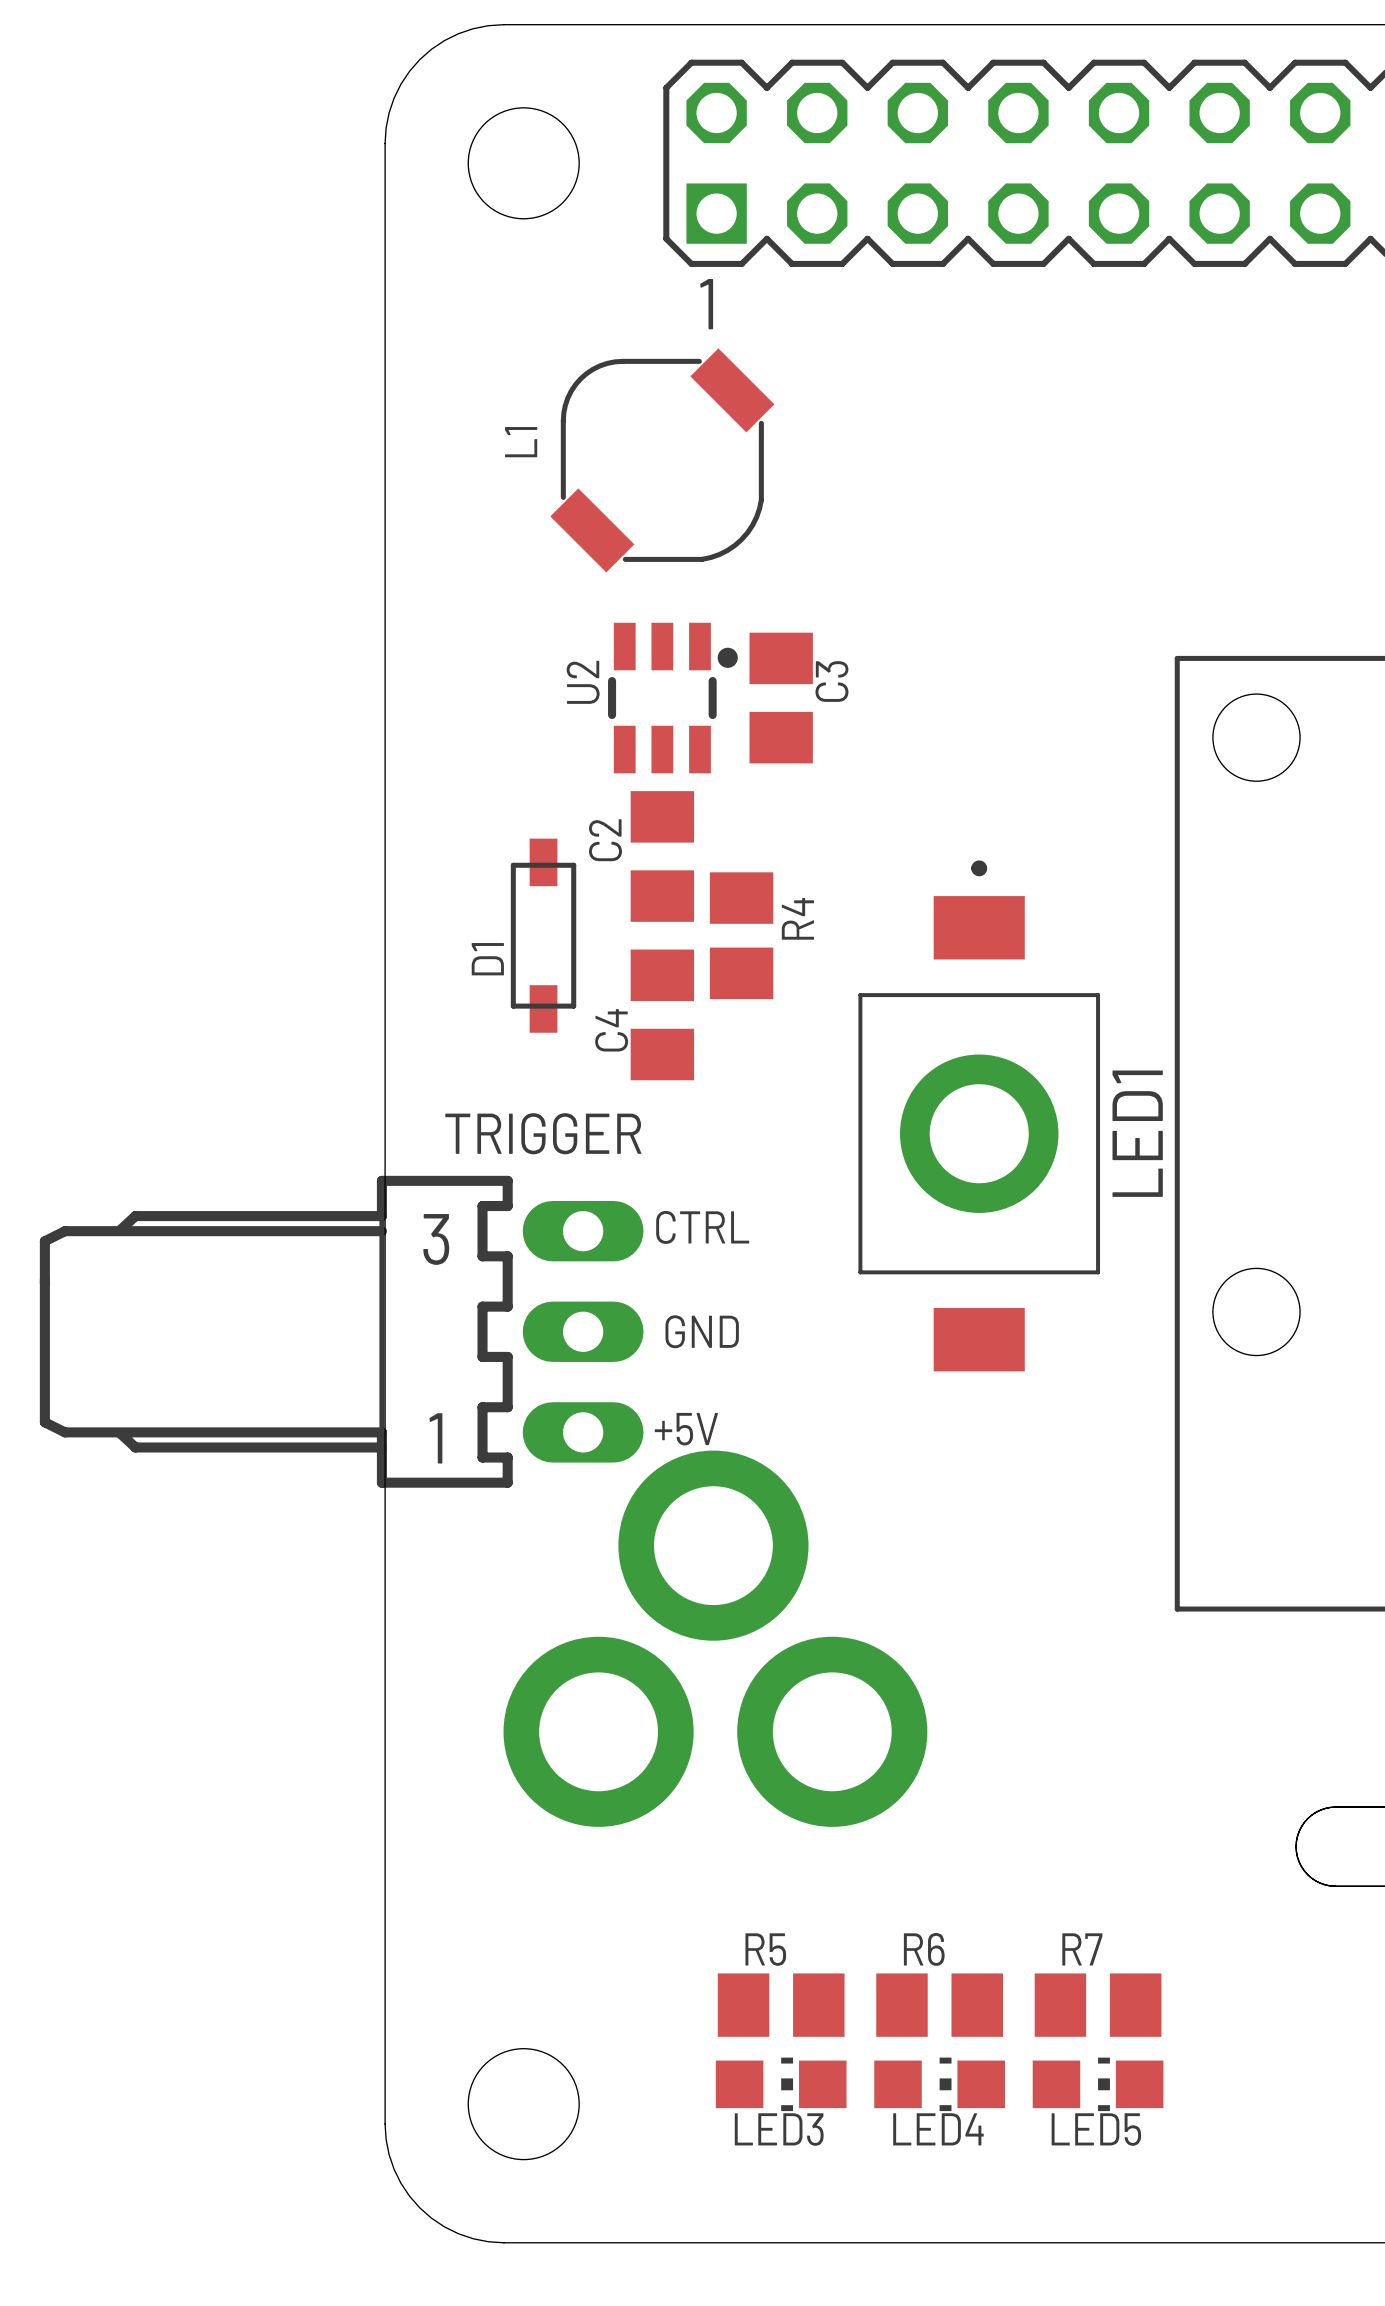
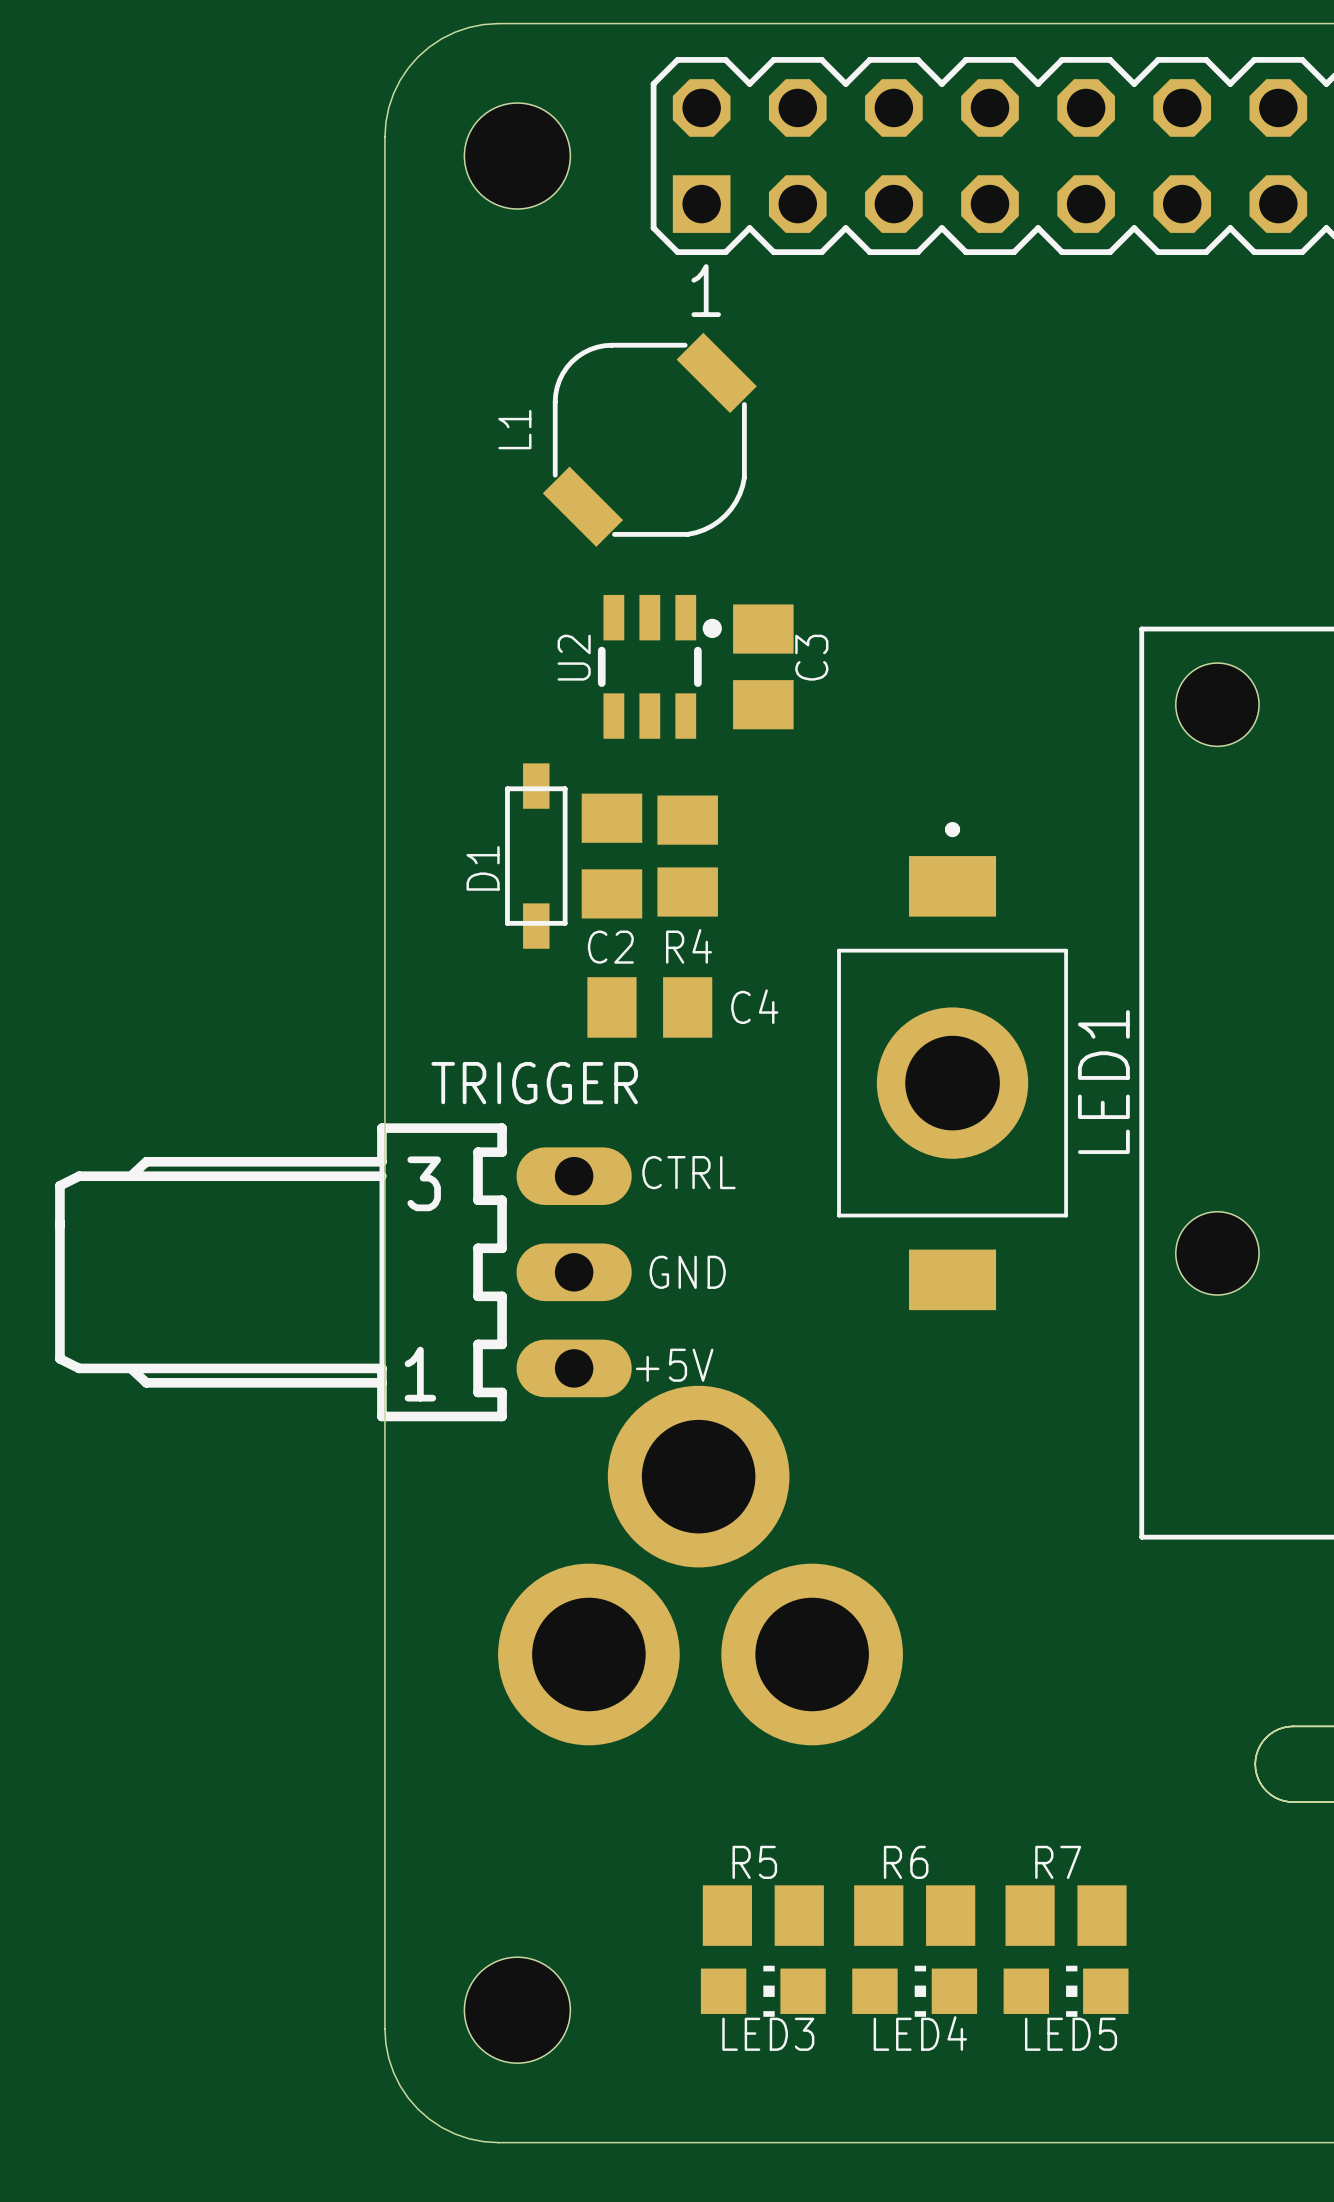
C2 name rotation: 0° (605, 840) -> 90° clockwise (610, 947)
C2 name position: C2 (605, 840) -> C2 (610, 947)
C2 position: (662, 856) -> (611, 856)
R4 name rotation: 0° (797, 918) -> 90° clockwise (688, 946)
R4 name position: R4 (797, 918) -> R4 (688, 946)
D1 position: (543, 935) -> (536, 856)
R4 position: (741, 935) -> (687, 856)
C4 rotation: 0° (662, 1014) -> 90° clockwise (649, 1007)
C4 name position: C4 (611, 1030) -> C4 (754, 1006)

